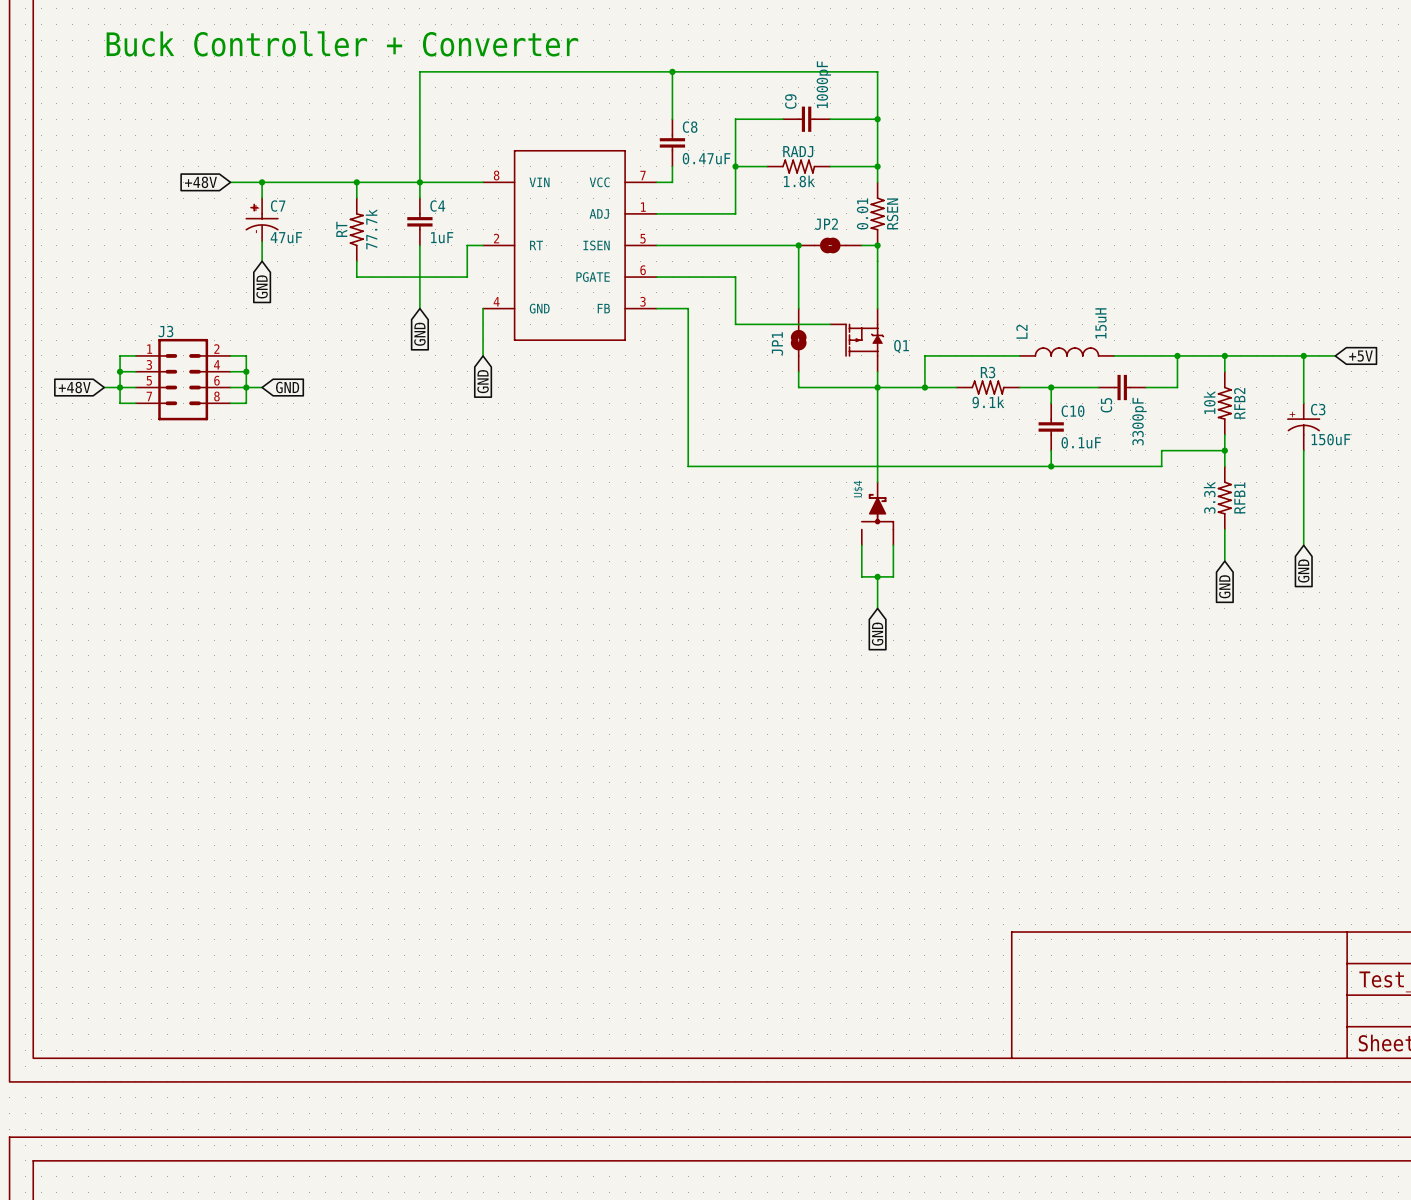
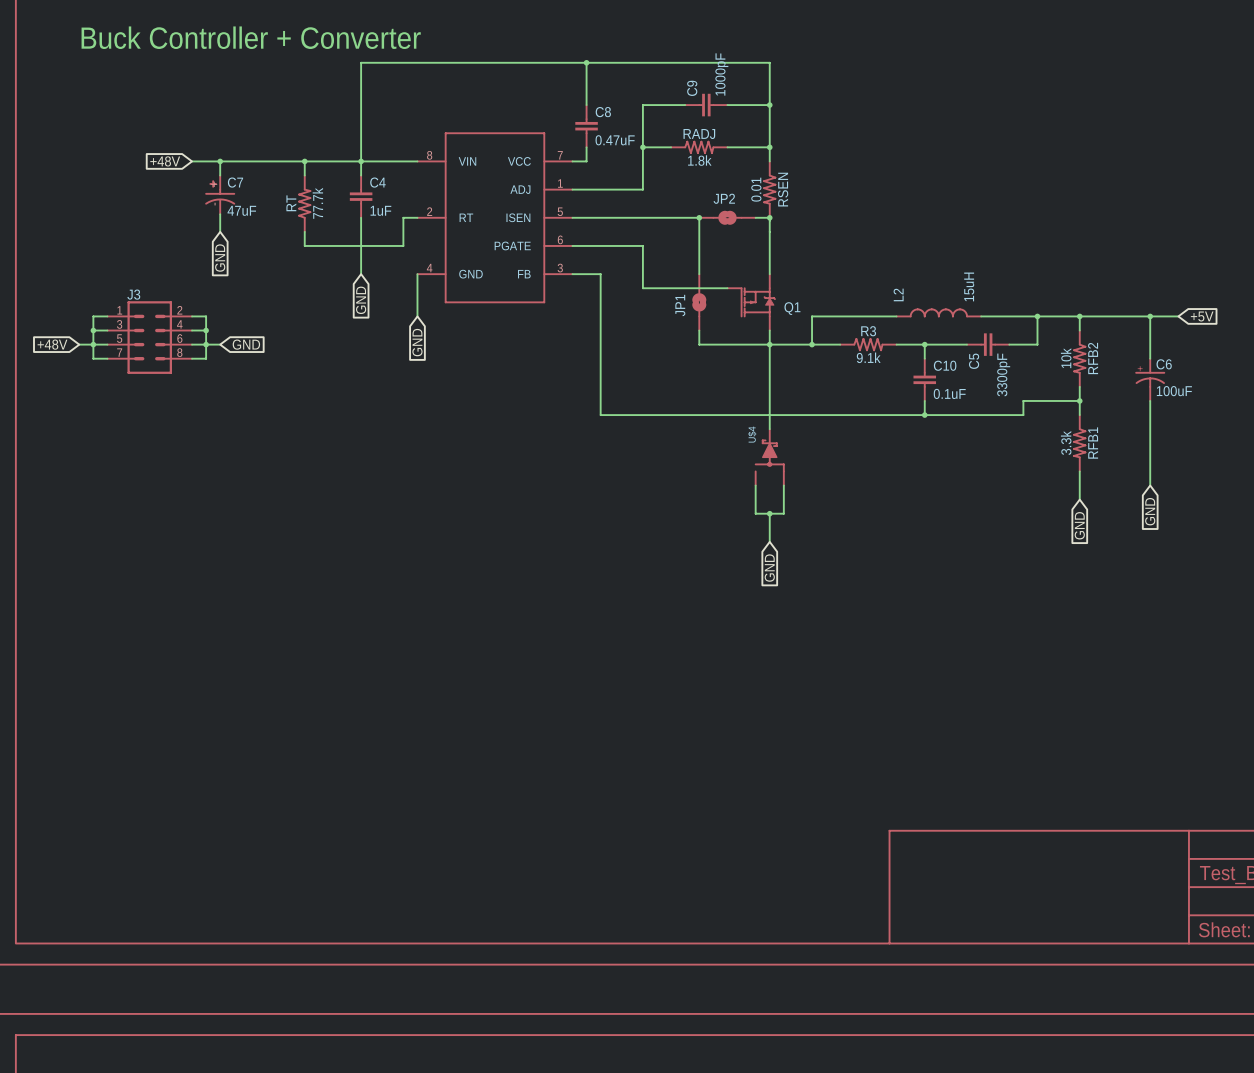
C3: 150uF (1303, 426) -> none
C6: none -> 100uF (1150, 379)

